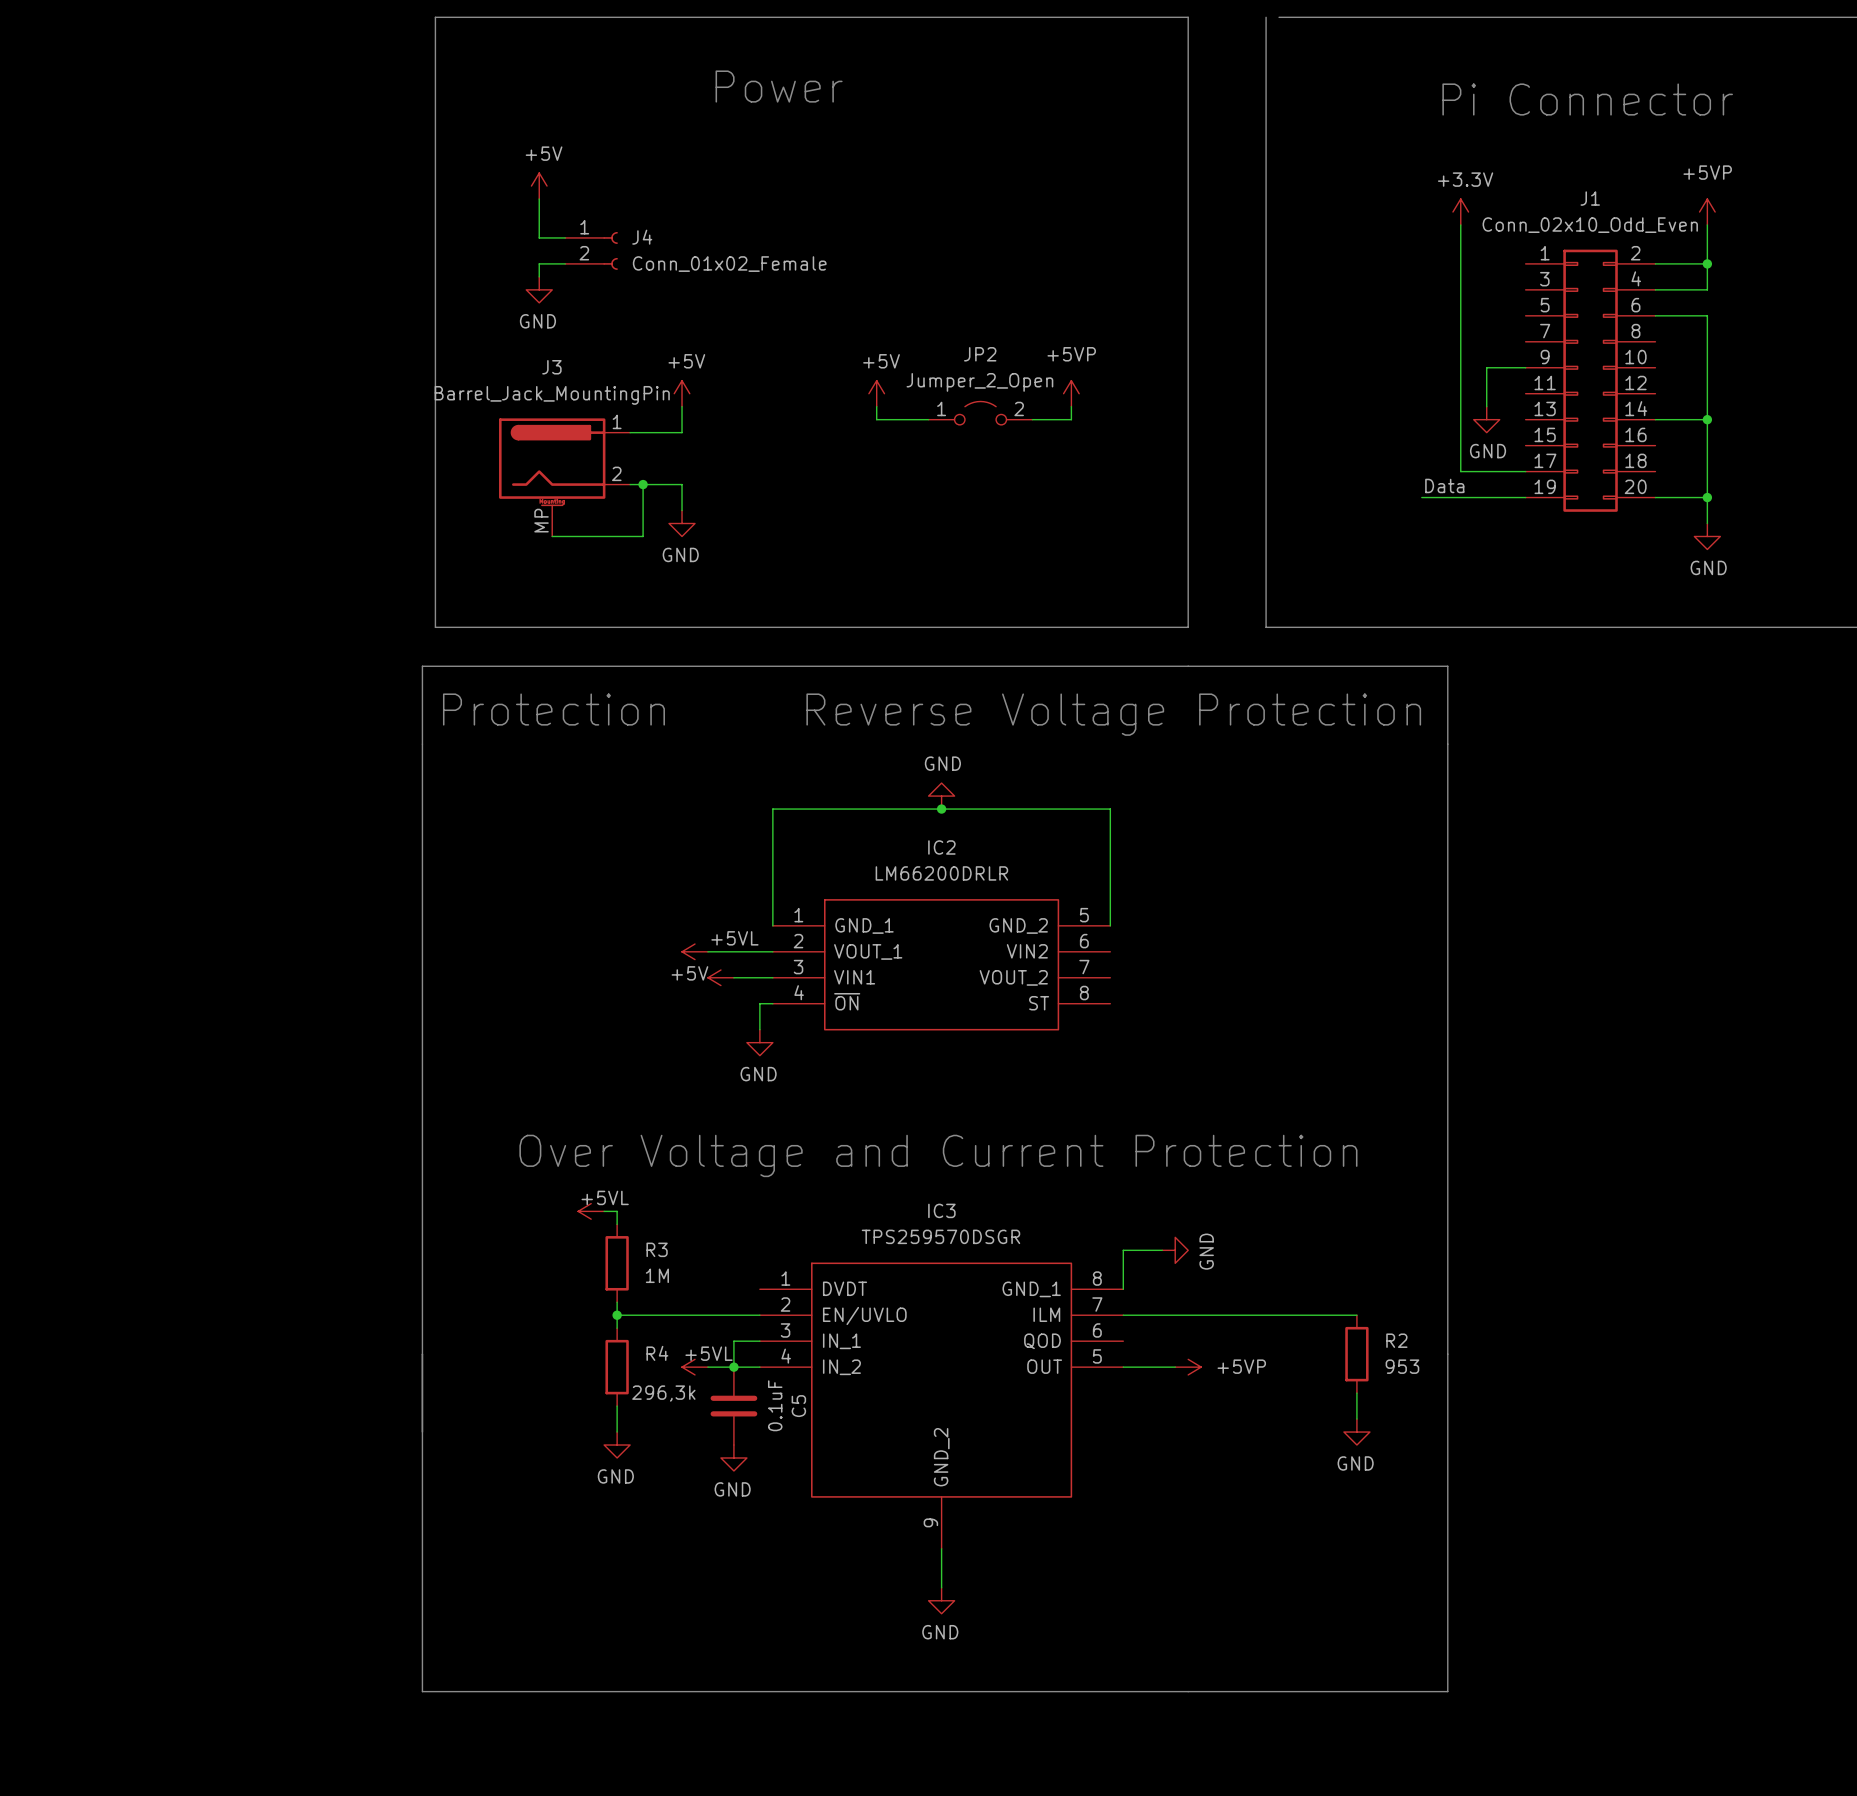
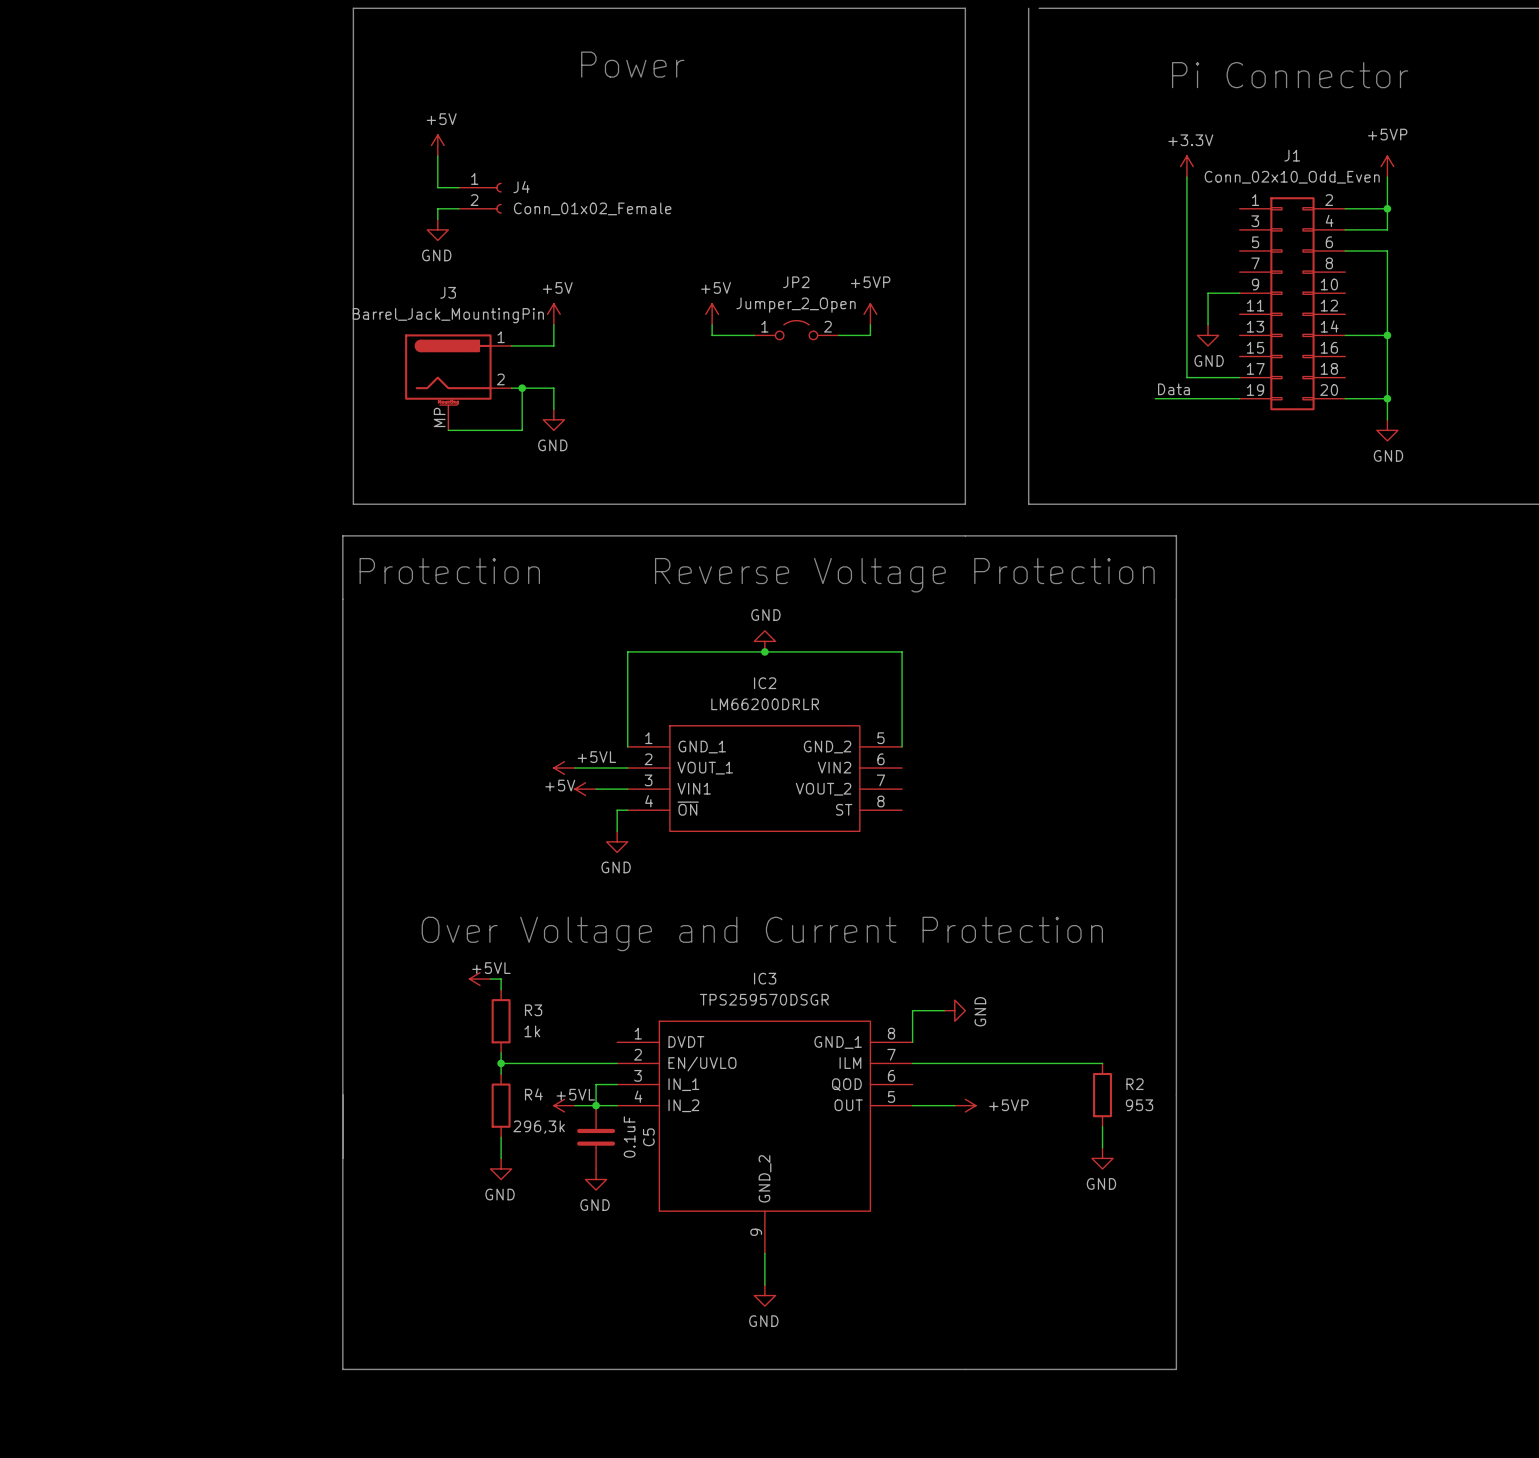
R3 value: 1M (657, 1275) -> 1k (532, 1031)

